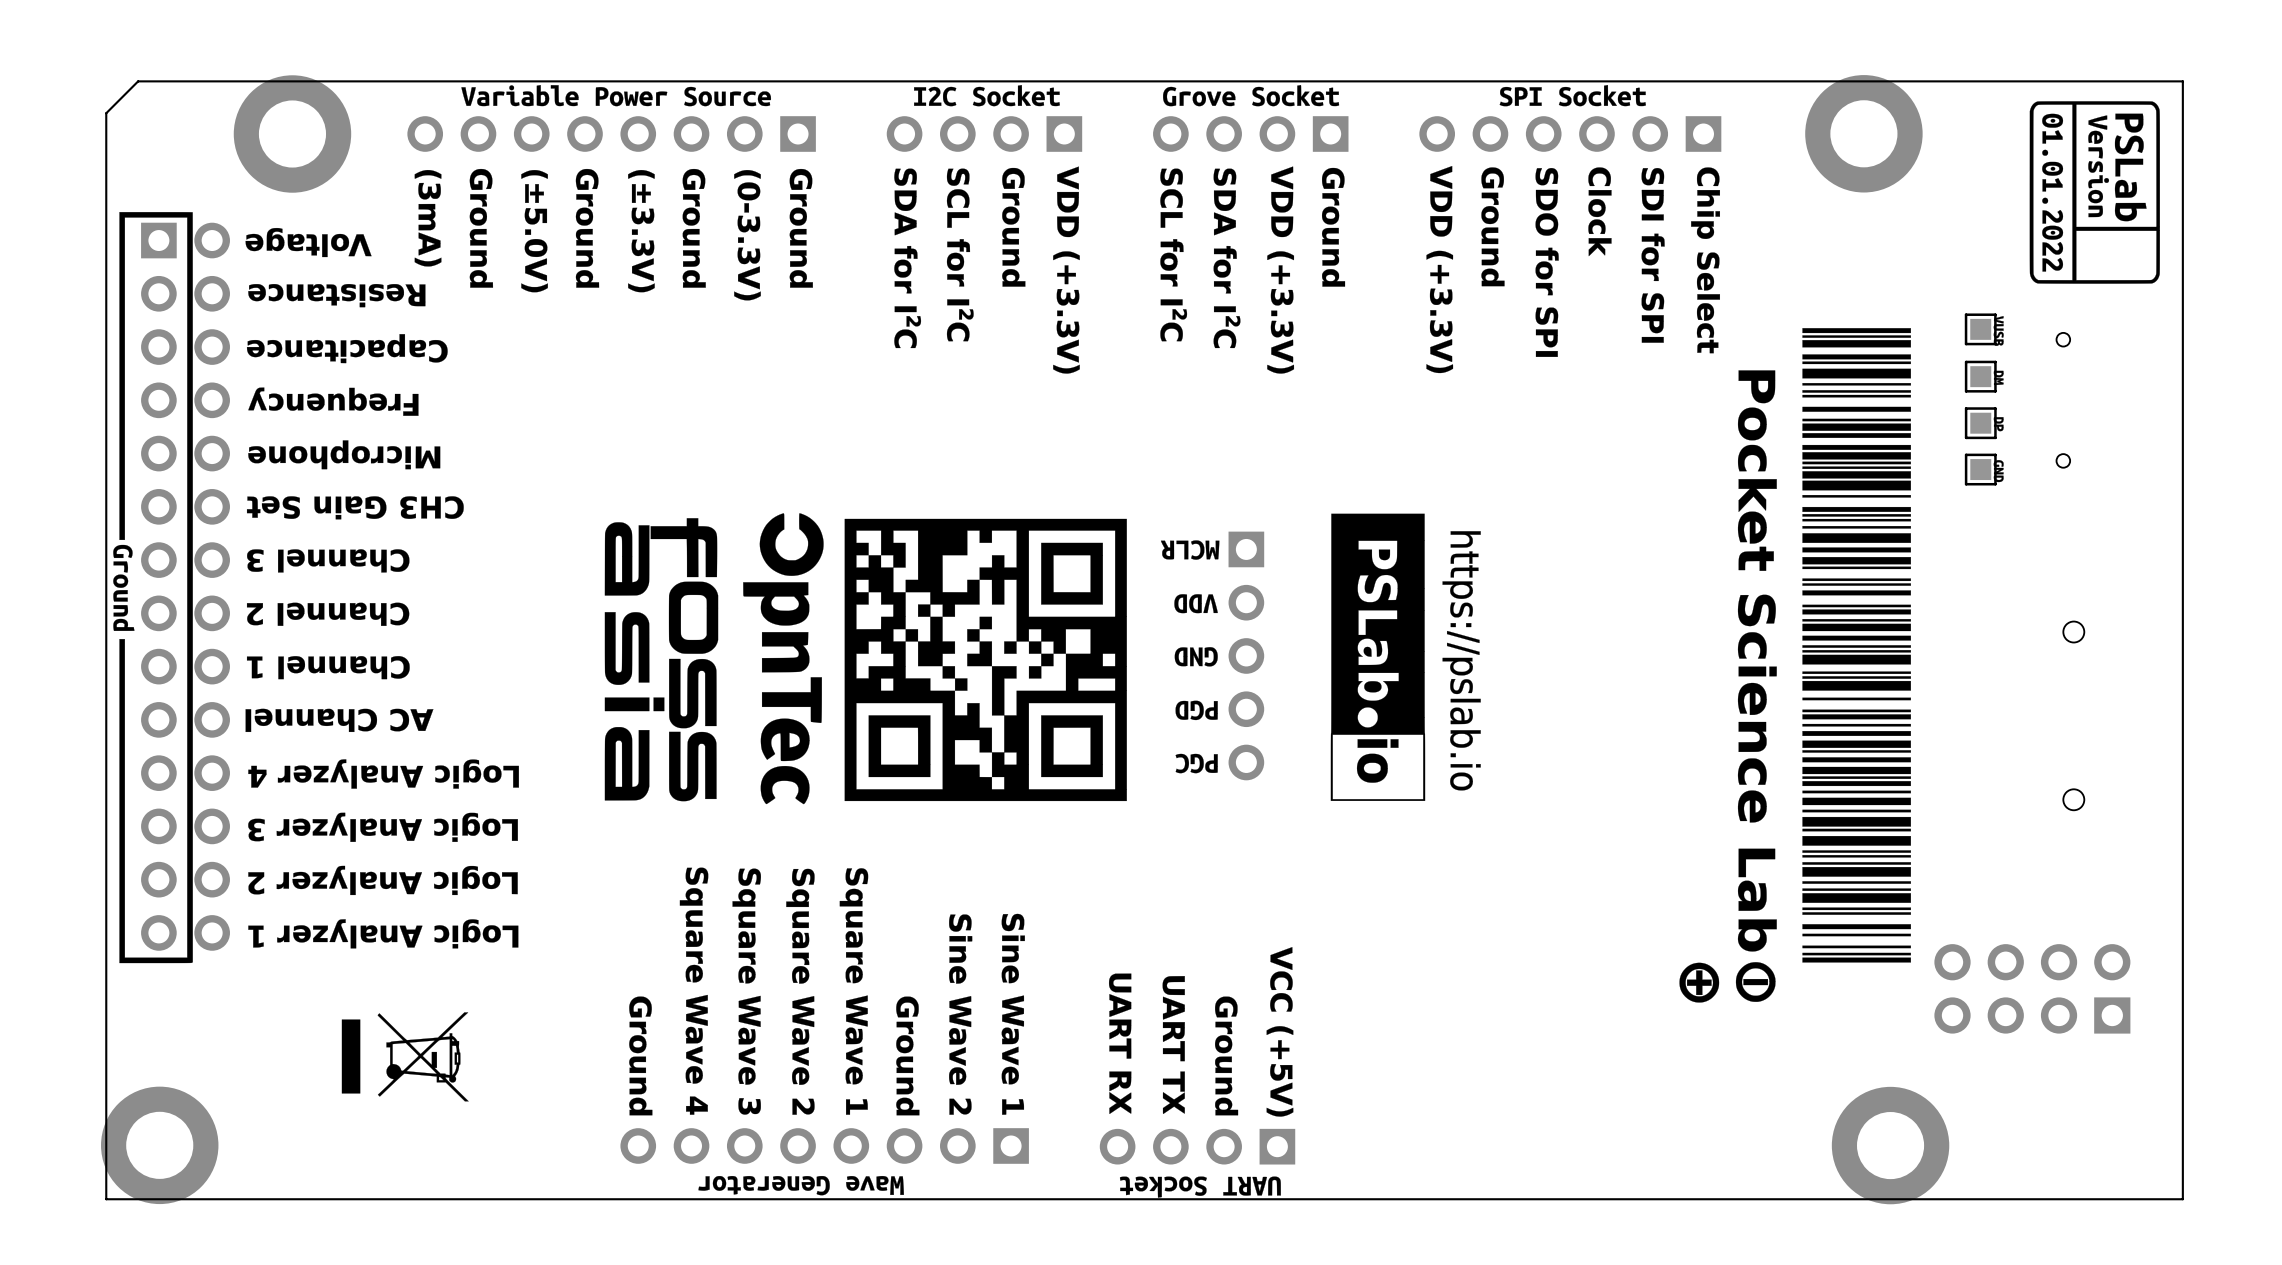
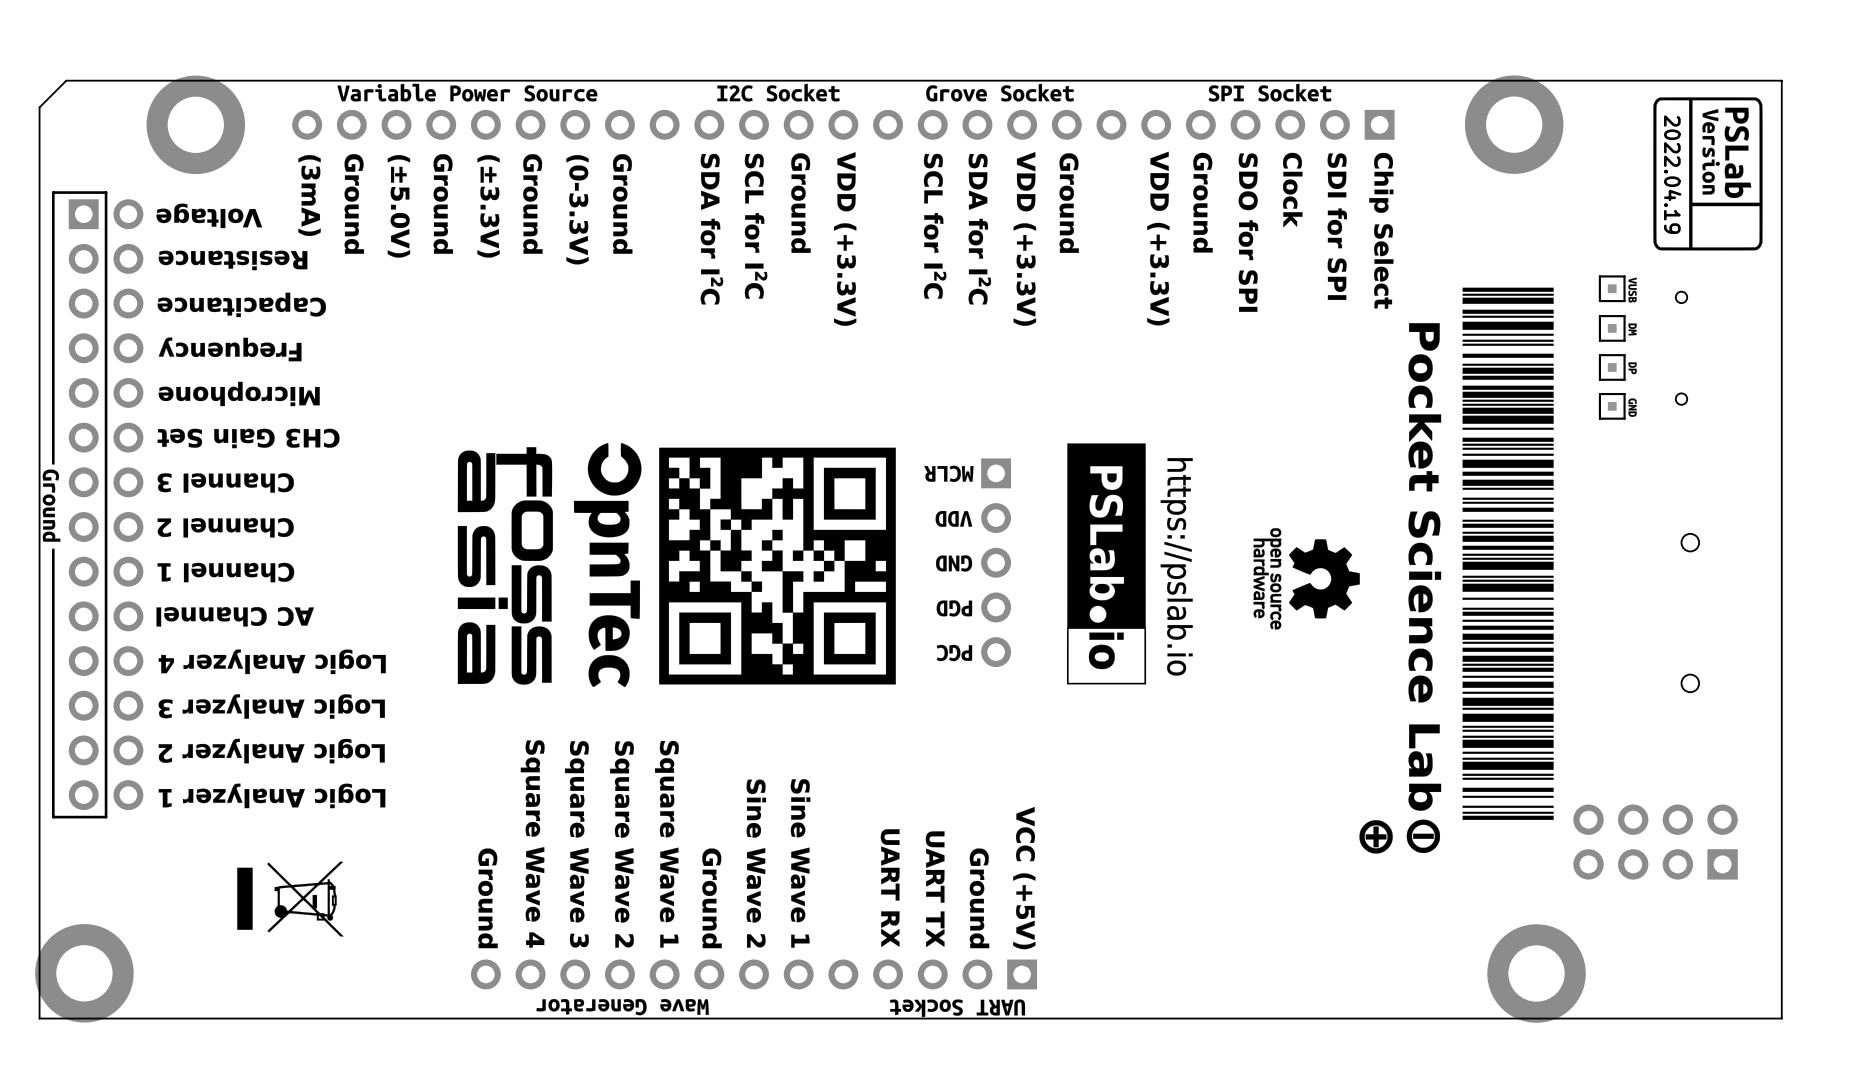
drawing shape: [113, 84, 2160, 1198] -> [42, 83, 1763, 1018]
part: (611, 134) -> none
part: (984, 134) -> none
part: none -> (843, 124)
part: (1250, 134) -> none
part footprint: [1964, 313, 1997, 346] -> [1598, 275, 1626, 303]
part footprint: [1964, 360, 1997, 393] -> [1598, 315, 1626, 342]
part footprint: [1964, 407, 1997, 440] -> [1598, 354, 1626, 381]
part footprint: [1964, 453, 1997, 486] -> [1598, 392, 1626, 420]
drawing: none -> [1253, 528, 1360, 630]
part: (824, 1145) -> none
part: none -> (754, 974)

